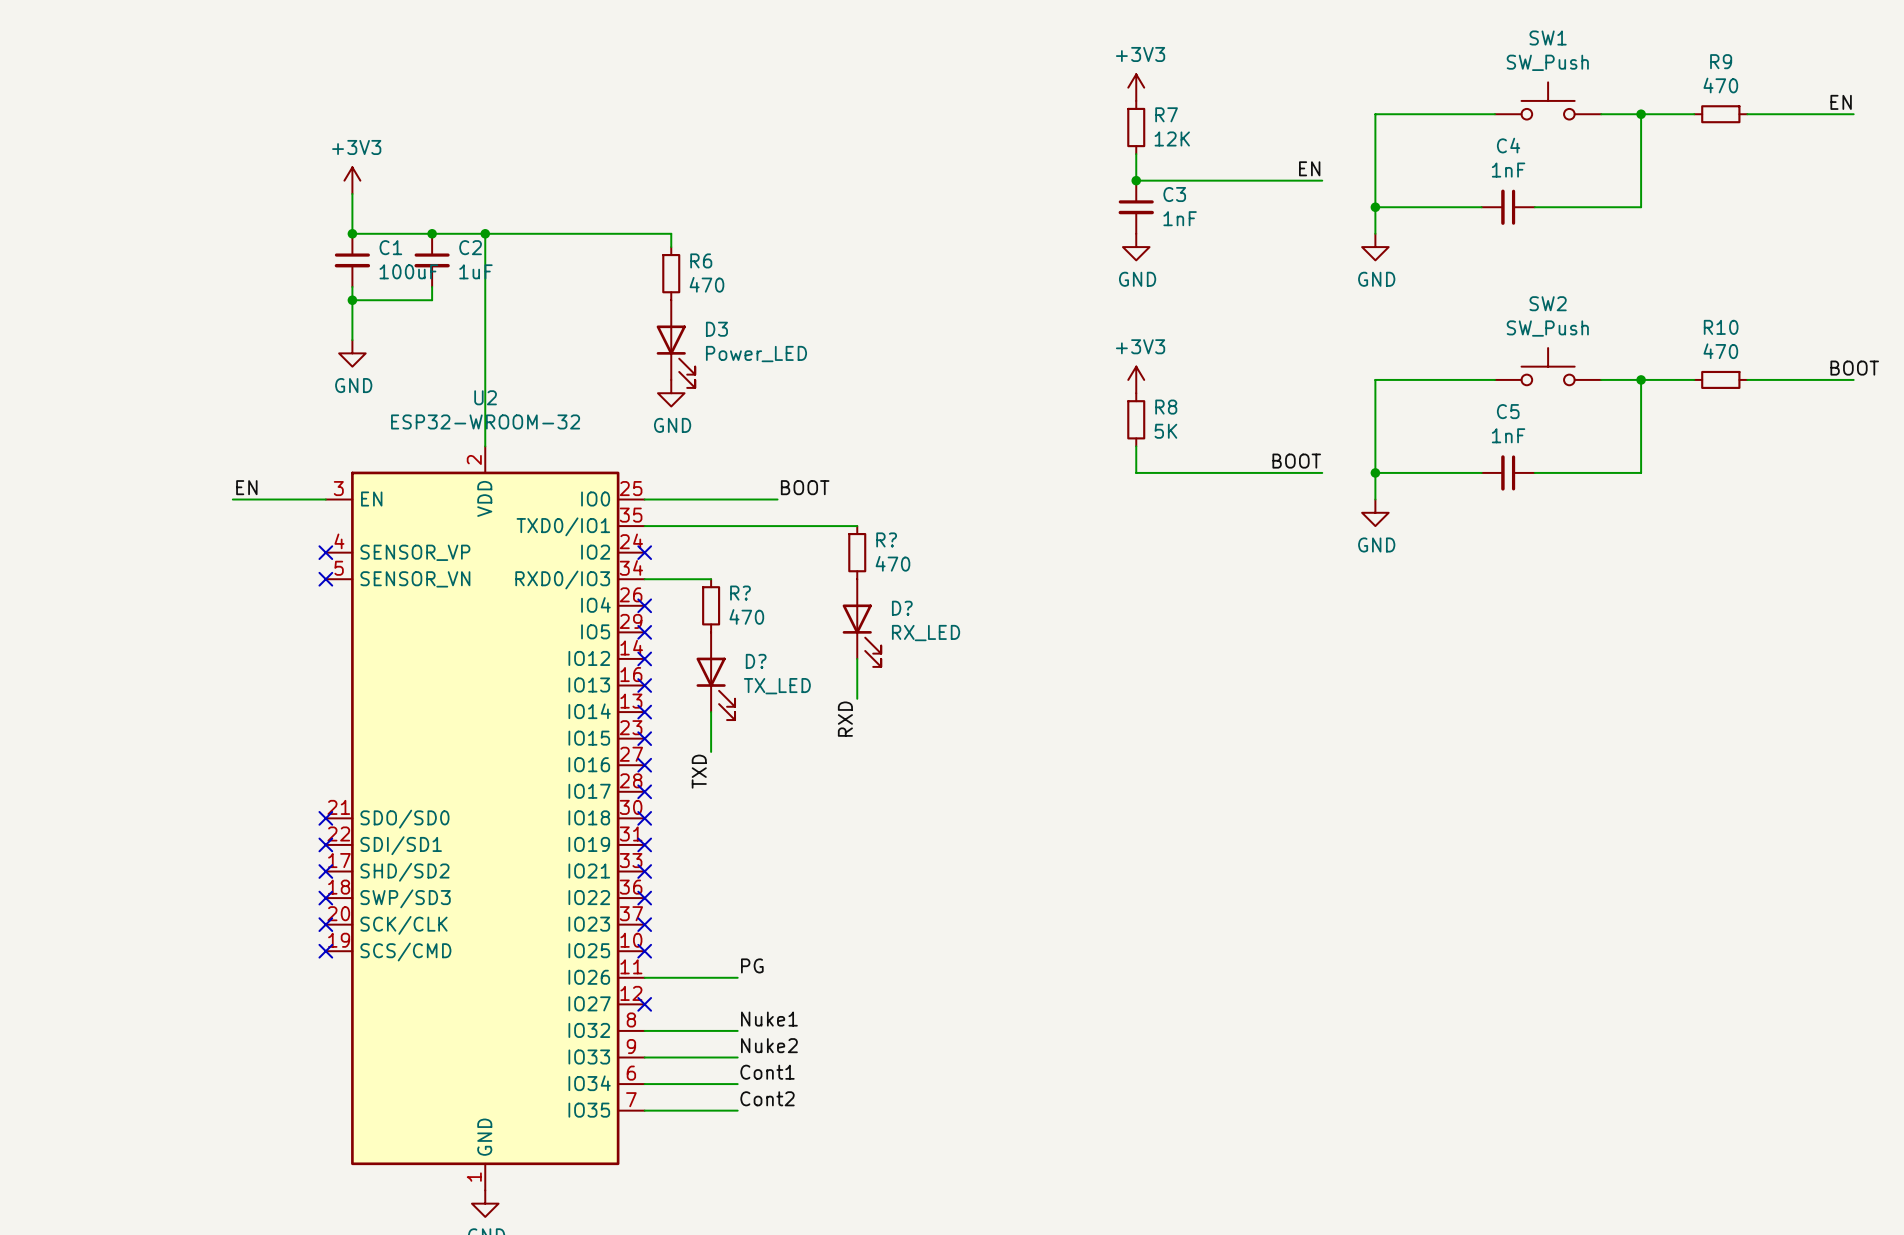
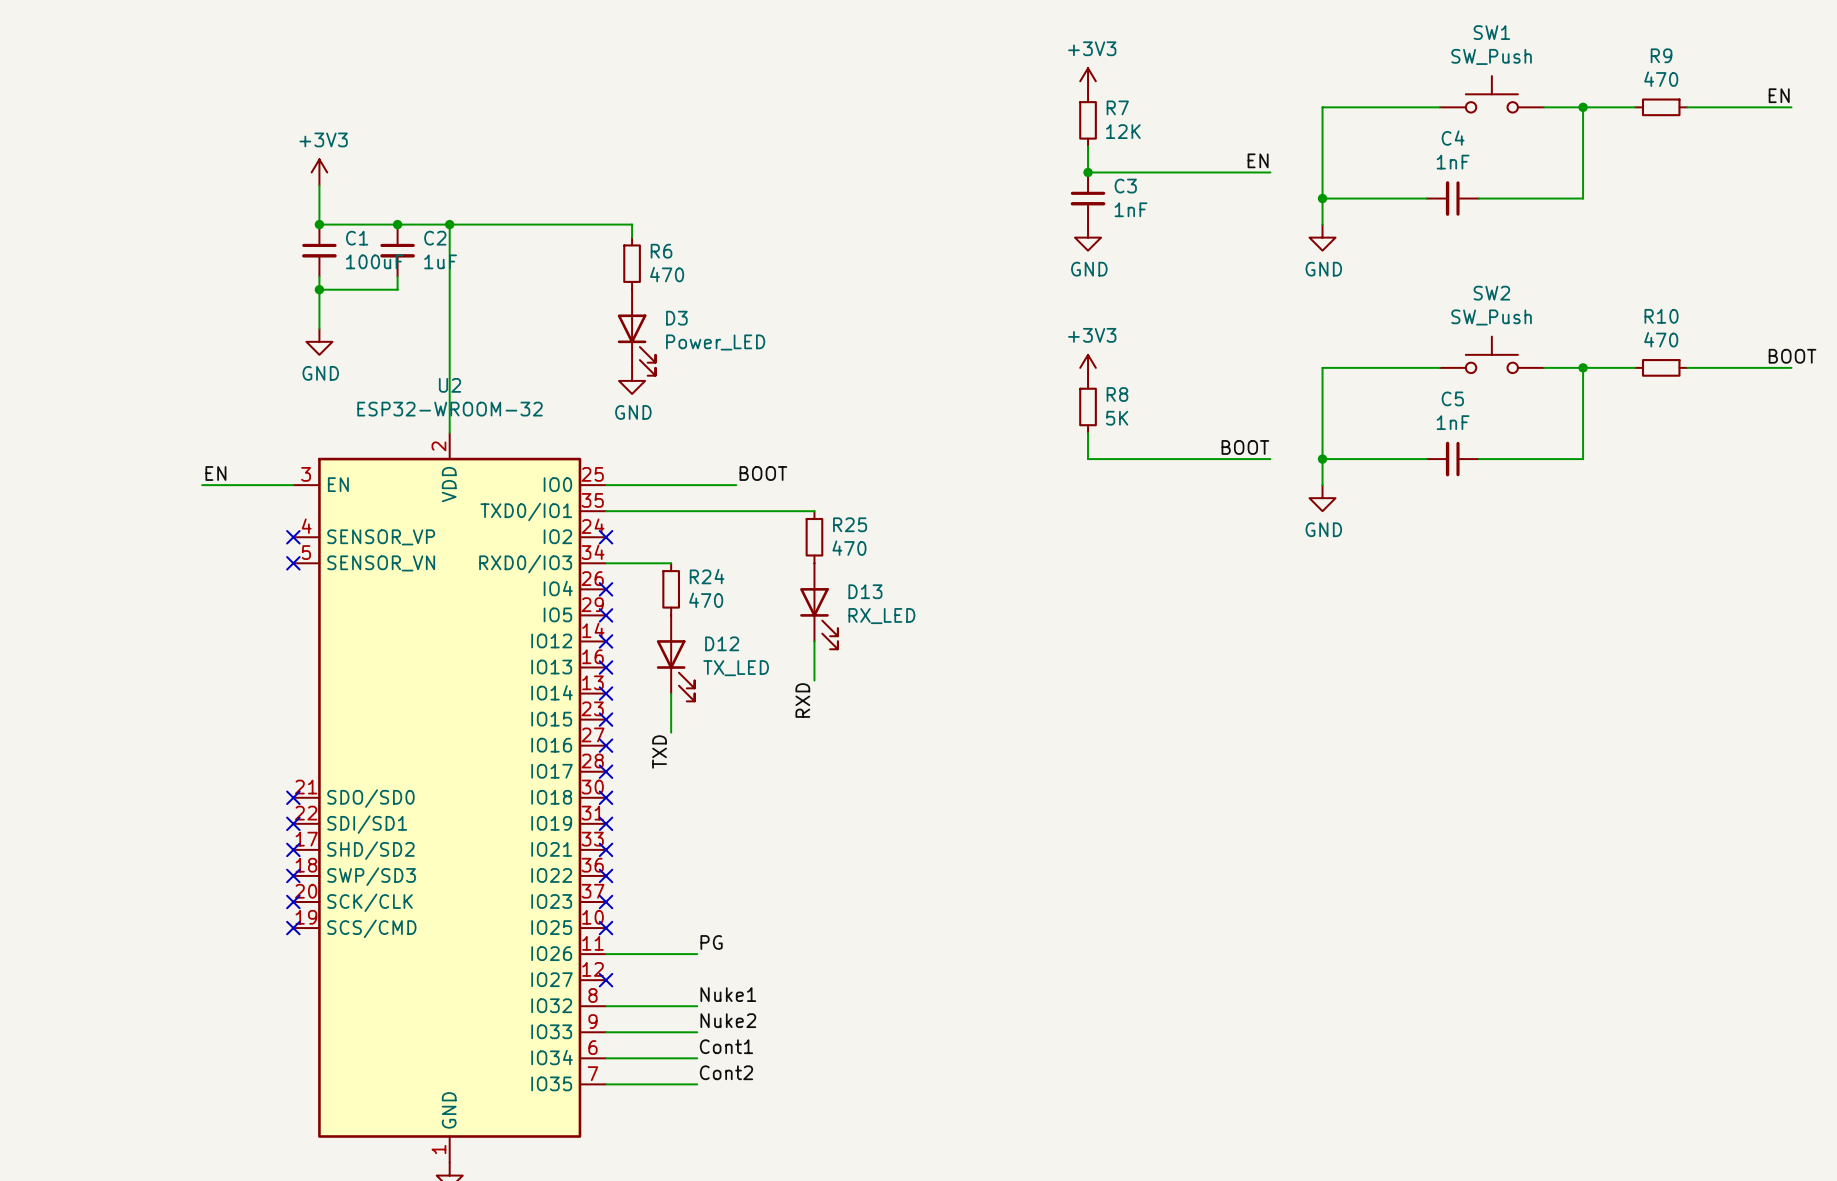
R? name: R? (886, 539) -> R25 (850, 524)
R? name: R? (740, 593) -> R24 (707, 576)
D? name: D? (902, 608) -> D13 (865, 591)
D? name: D? (756, 661) -> D12 (722, 643)

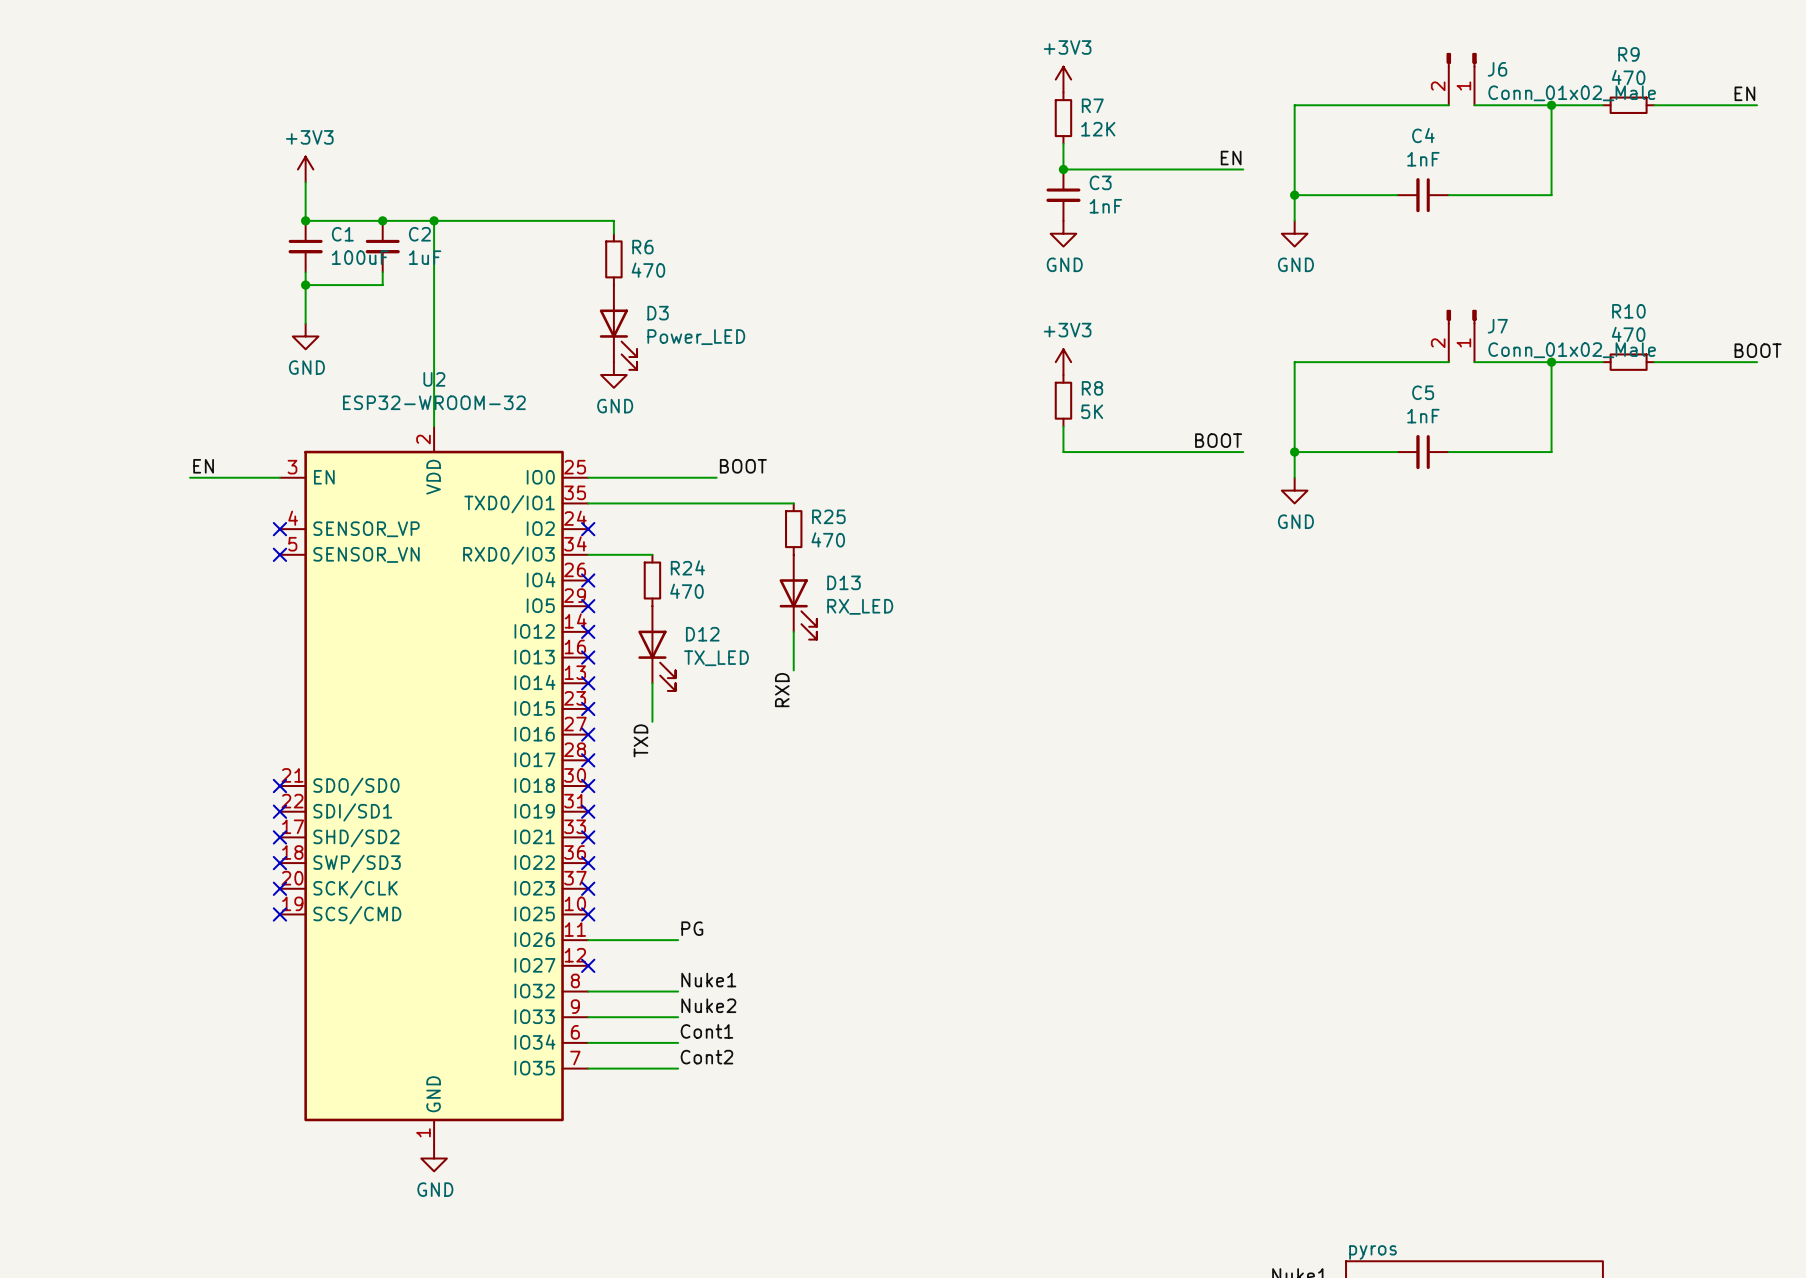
J6: none -> Conn_01x02_Male (1461, 79)
SW1: SW_Push (1491, 94) -> none
J7: none -> Conn_01x02_Male (1461, 336)
SW2: SW_Push (1491, 354) -> none

